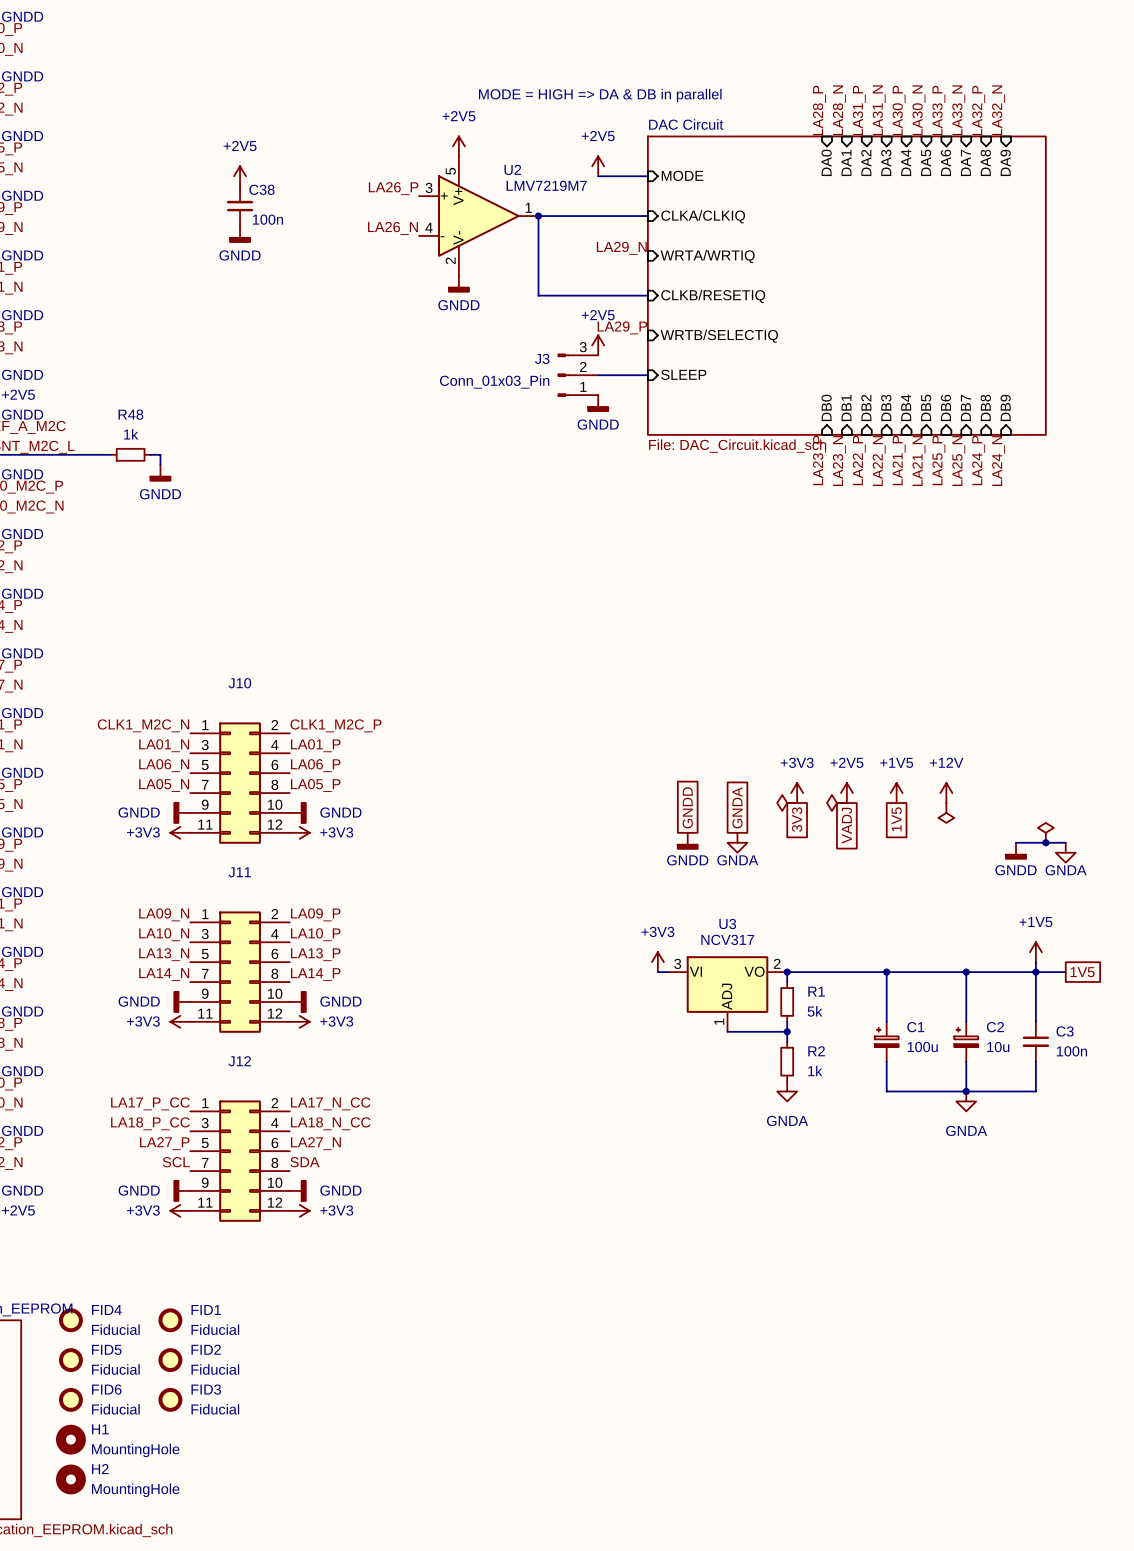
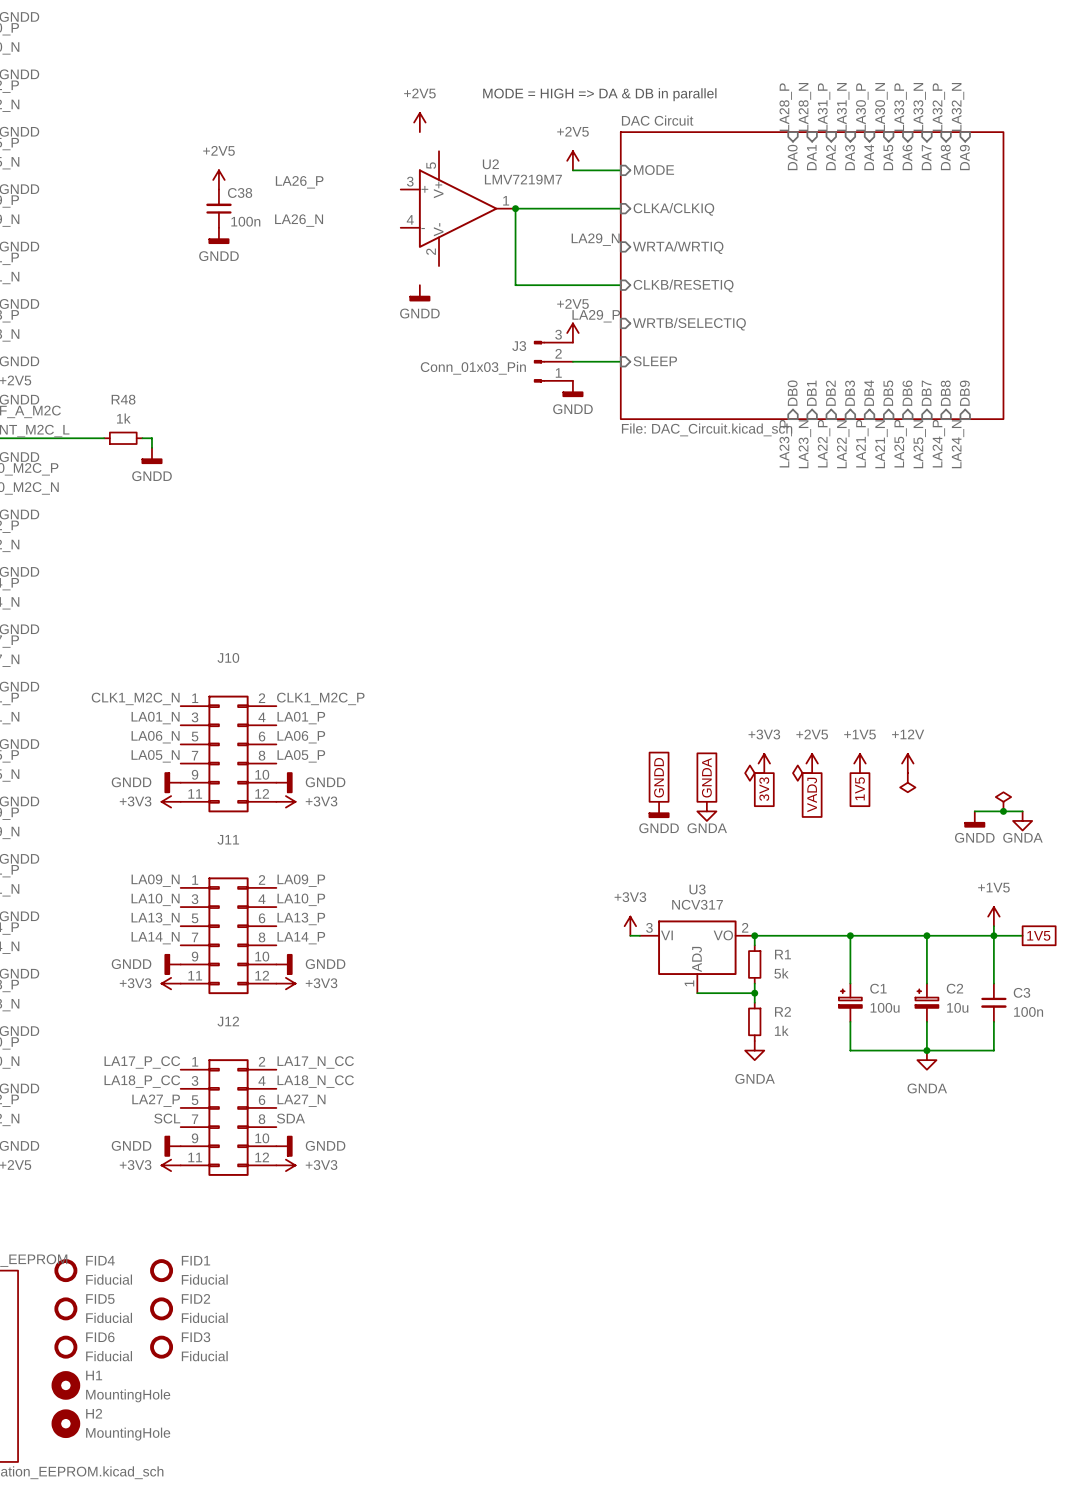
text position: MODE = HIGH => DA & DB in parallel (600, 95) -> MODE = HIGH => DA & DB in parallel (599, 94)
power symbol position: +2V5 (458, 146) -> +2V5 (419, 122)
power symbol position: +2V5 (240, 176) -> +2V5 (218, 179)
label position: LA26_P (393, 188) -> LA26_P (299, 182)
C38 position: (240, 206) -> (218, 208)
label position: LA26_N (392, 228) -> LA26_N (299, 220)
power symbol position: GNDD (240, 234) -> GNDD (218, 235)
power symbol position: GNDD (458, 284) -> GNDD (419, 293)

